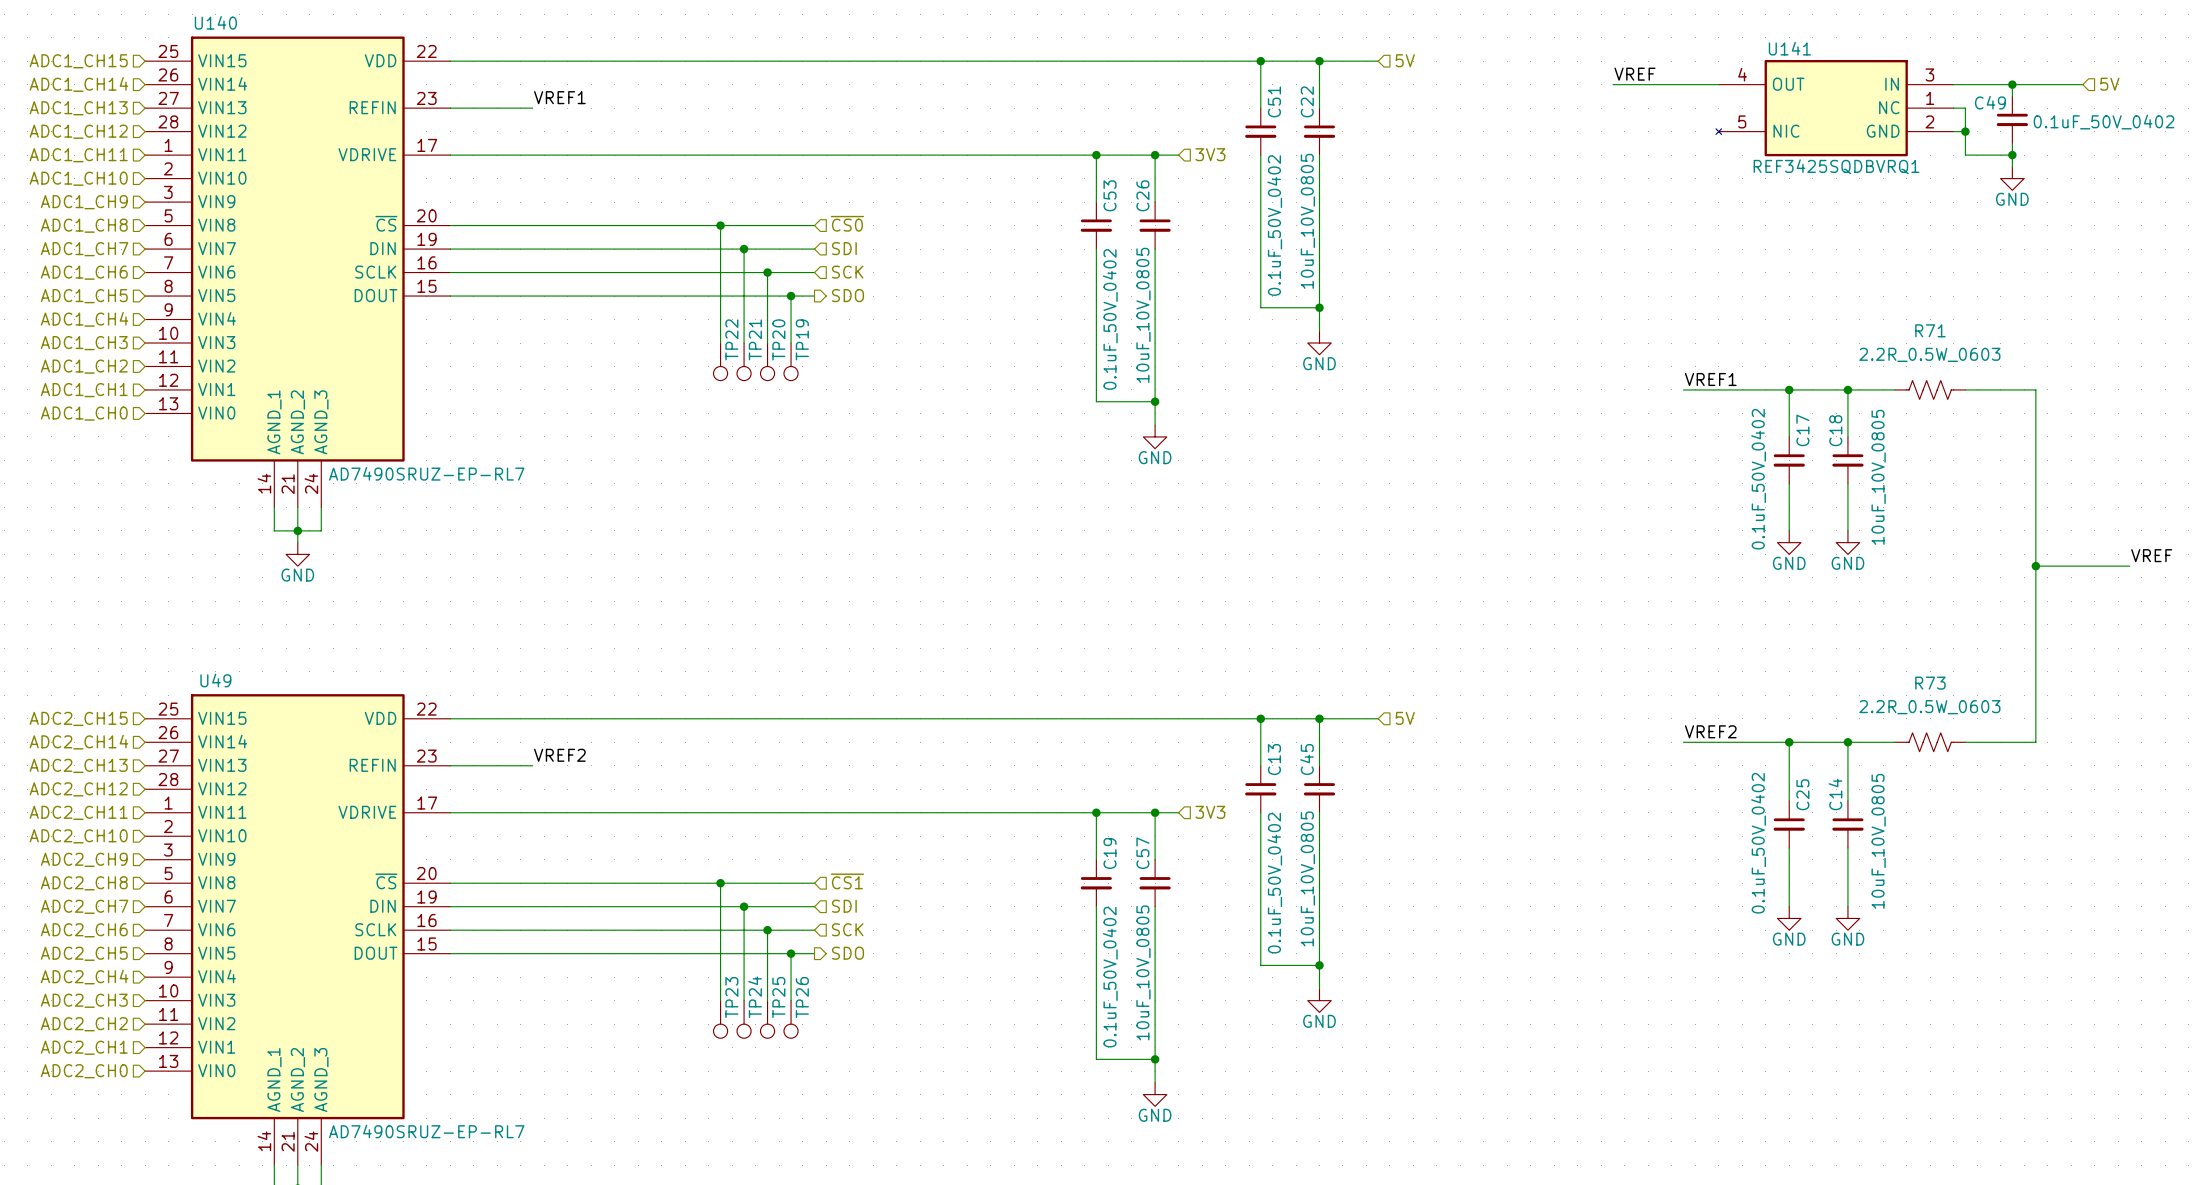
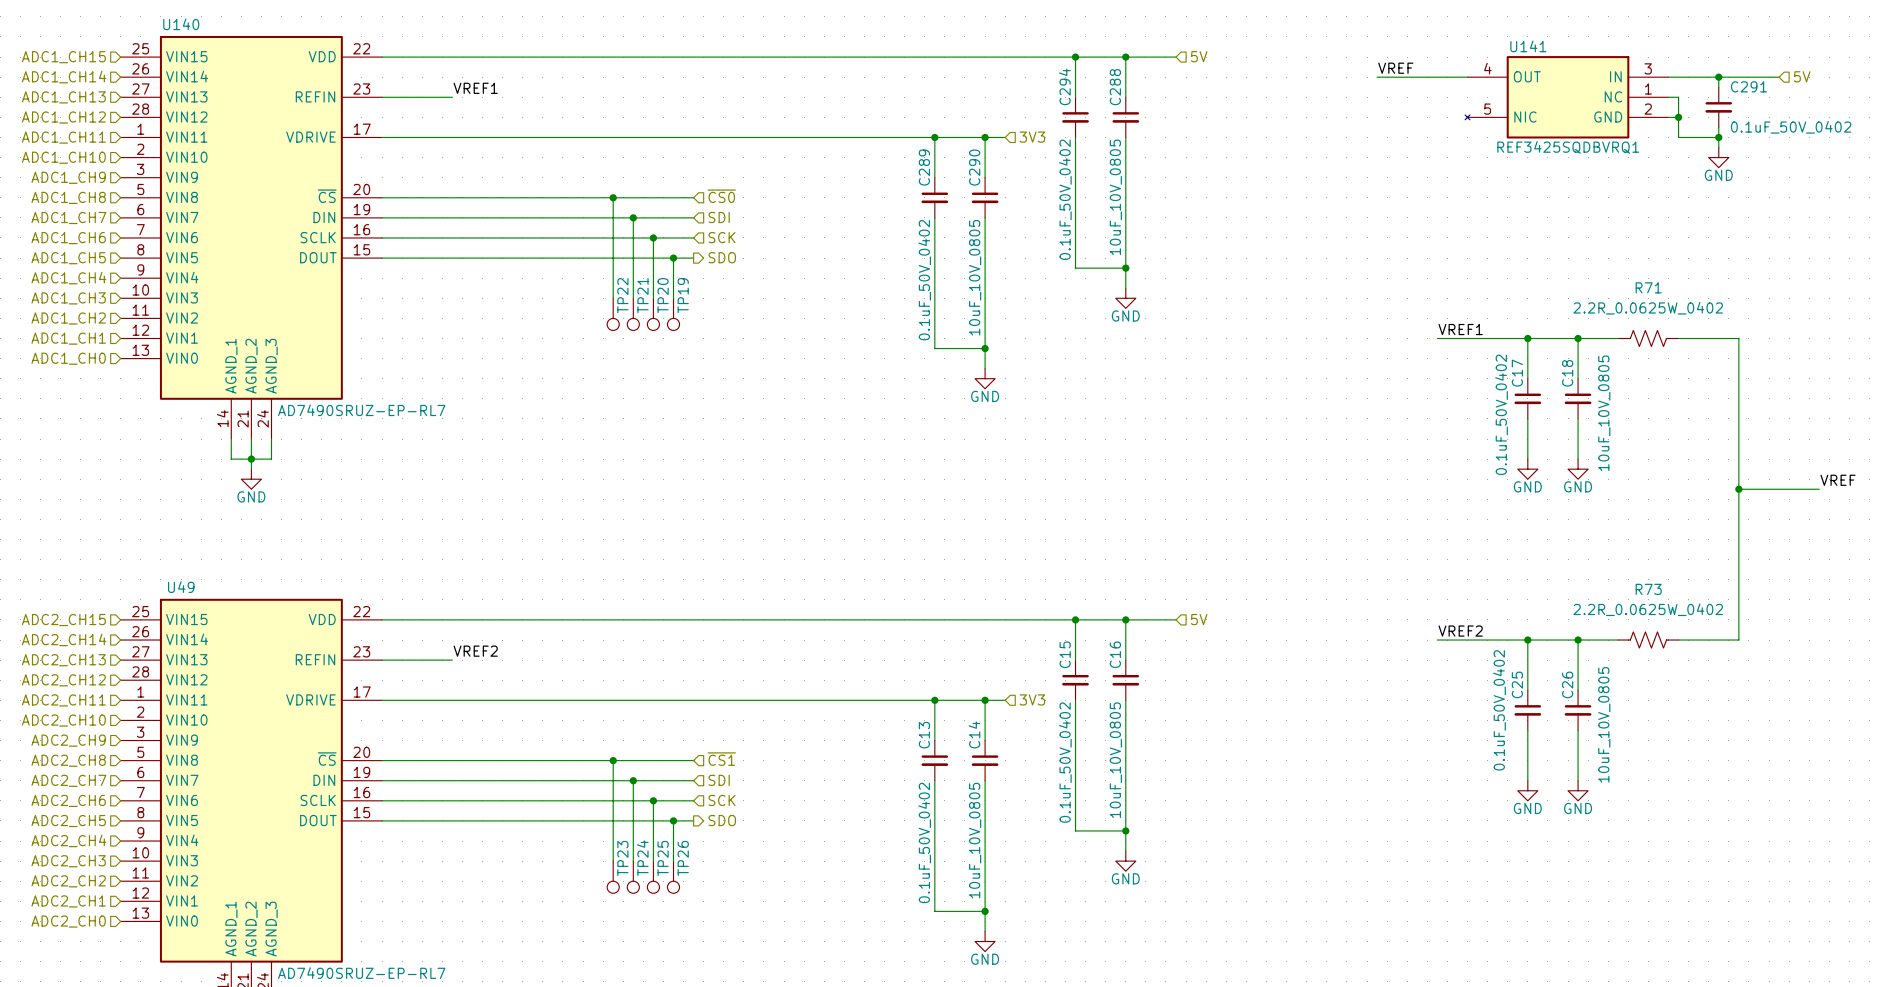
C51 name: C51 (1274, 101) -> C294 (1064, 86)
C22 name: C22 (1307, 101) -> C288 (1115, 87)
C49 name: C49 (1990, 102) -> C291 (1749, 86)
C49 value position: 0.1uF_50V_0402 (2103, 122) -> 0.1uF_50V_0402 (1791, 127)
C53 name: C53 (1110, 195) -> C289 (924, 167)
C26 name: C26 (1142, 195) -> C290 (974, 167)
C22 value position: 10uF_10V_0805 (1307, 221) -> 10uF_10V_0805 (1115, 197)
C51 value position: 0.1uF_50V_0402 (1274, 225) -> 0.1uF_50V_0402 (1065, 199)
C26 value position: 10uF_10V_0805 (1143, 315) -> 10uF_10V_0805 (975, 277)
C53 value position: 0.1uF_50V_0402 (1110, 319) -> 0.1uF_50V_0402 (924, 280)
R71 value: 2.2R_0.5W_0603 (1929, 354) -> 2.2R_0.0625W_0402 (1648, 308)
C17 name position: C17 (1802, 430) -> C17 (1517, 373)
R73 value: 2.2R_0.5W_0603 (1929, 707) -> 2.2R_0.0625W_0402 (1648, 609)
C13 name: C13 (1274, 759) -> C15 (1065, 654)
C45 name: C45 (1307, 759) -> C16 (1115, 654)
C25 name position: C25 (1802, 794) -> C25 (1517, 684)
C14 name: C14 (1835, 794) -> C26 (1567, 684)
C25 value position: 0.1uF_50V_0402 (1758, 843) -> 0.1uF_50V_0402 (1499, 710)
C19 name: C19 (1110, 853) -> C13 (924, 735)
C57 name: C57 (1142, 853) -> C14 (974, 734)
C45 value position: 10uF_10V_0805 (1307, 878) -> 10uF_10V_0805 (1115, 760)
C13 value position: 0.1uF_50V_0402 (1274, 883) -> 0.1uF_50V_0402 (1065, 762)
C57 value position: 10uF_10V_0805 (1143, 972) -> 10uF_10V_0805 (975, 840)
C19 value position: 0.1uF_50V_0402 (1110, 977) -> 0.1uF_50V_0402 (924, 843)

